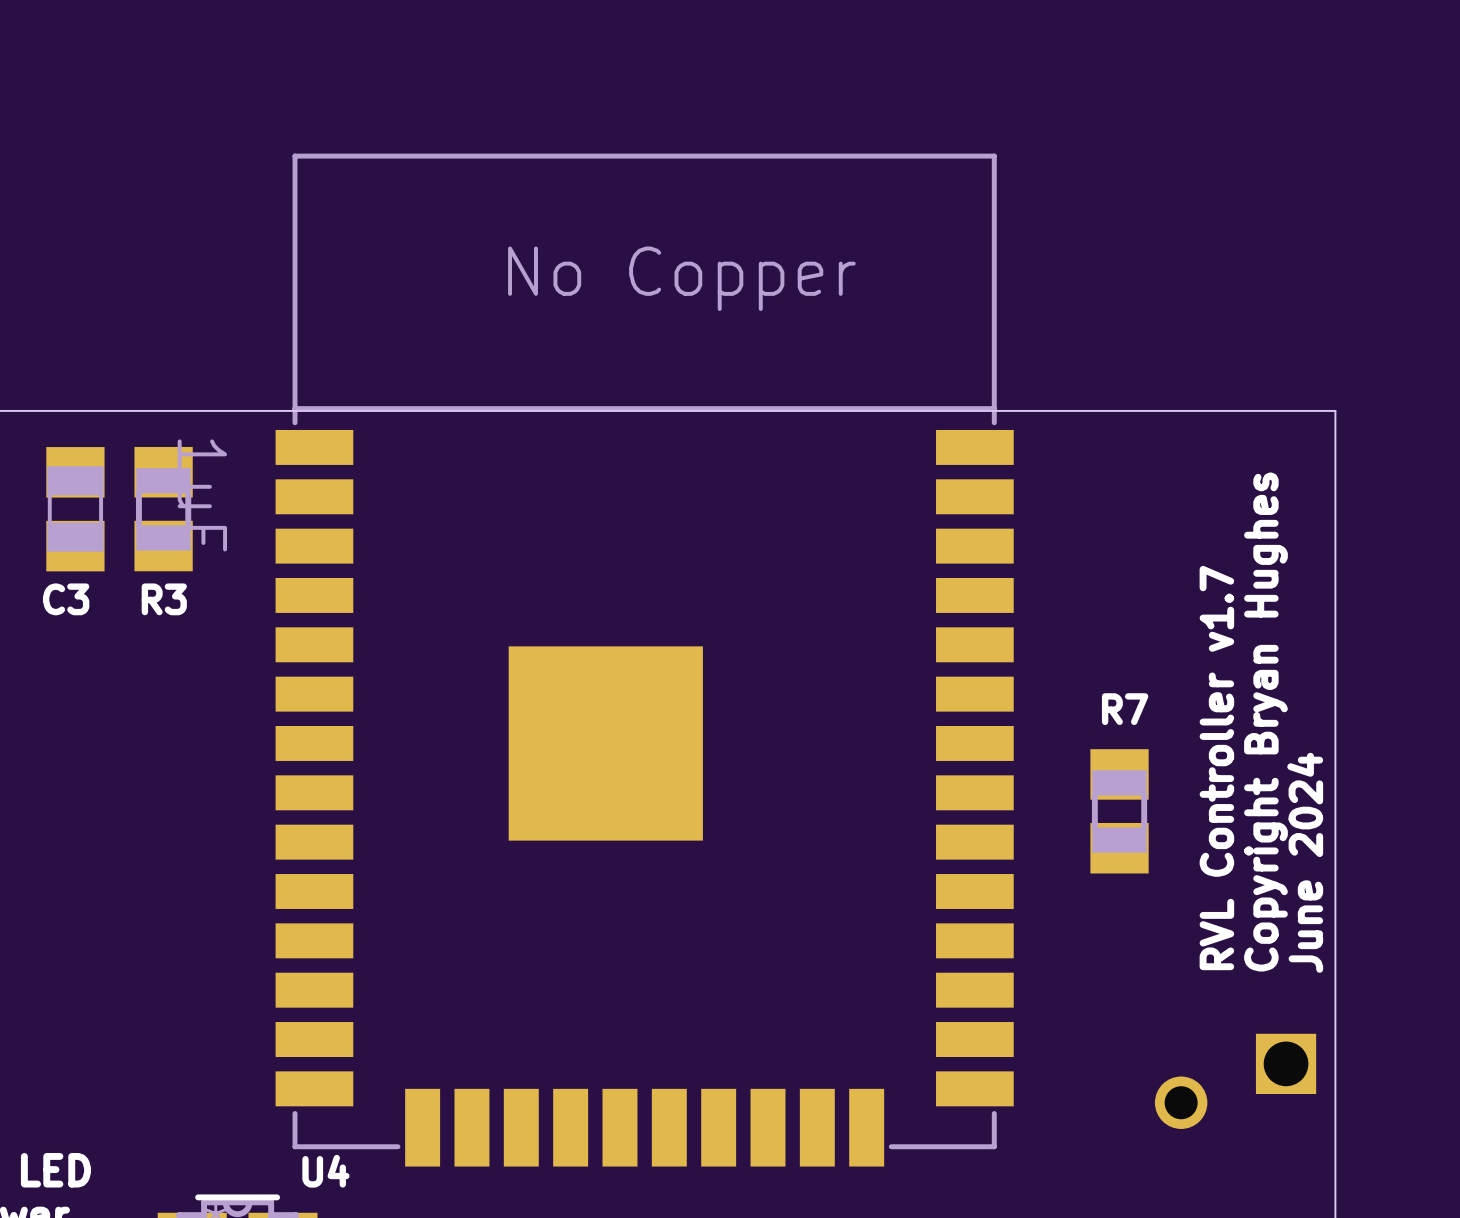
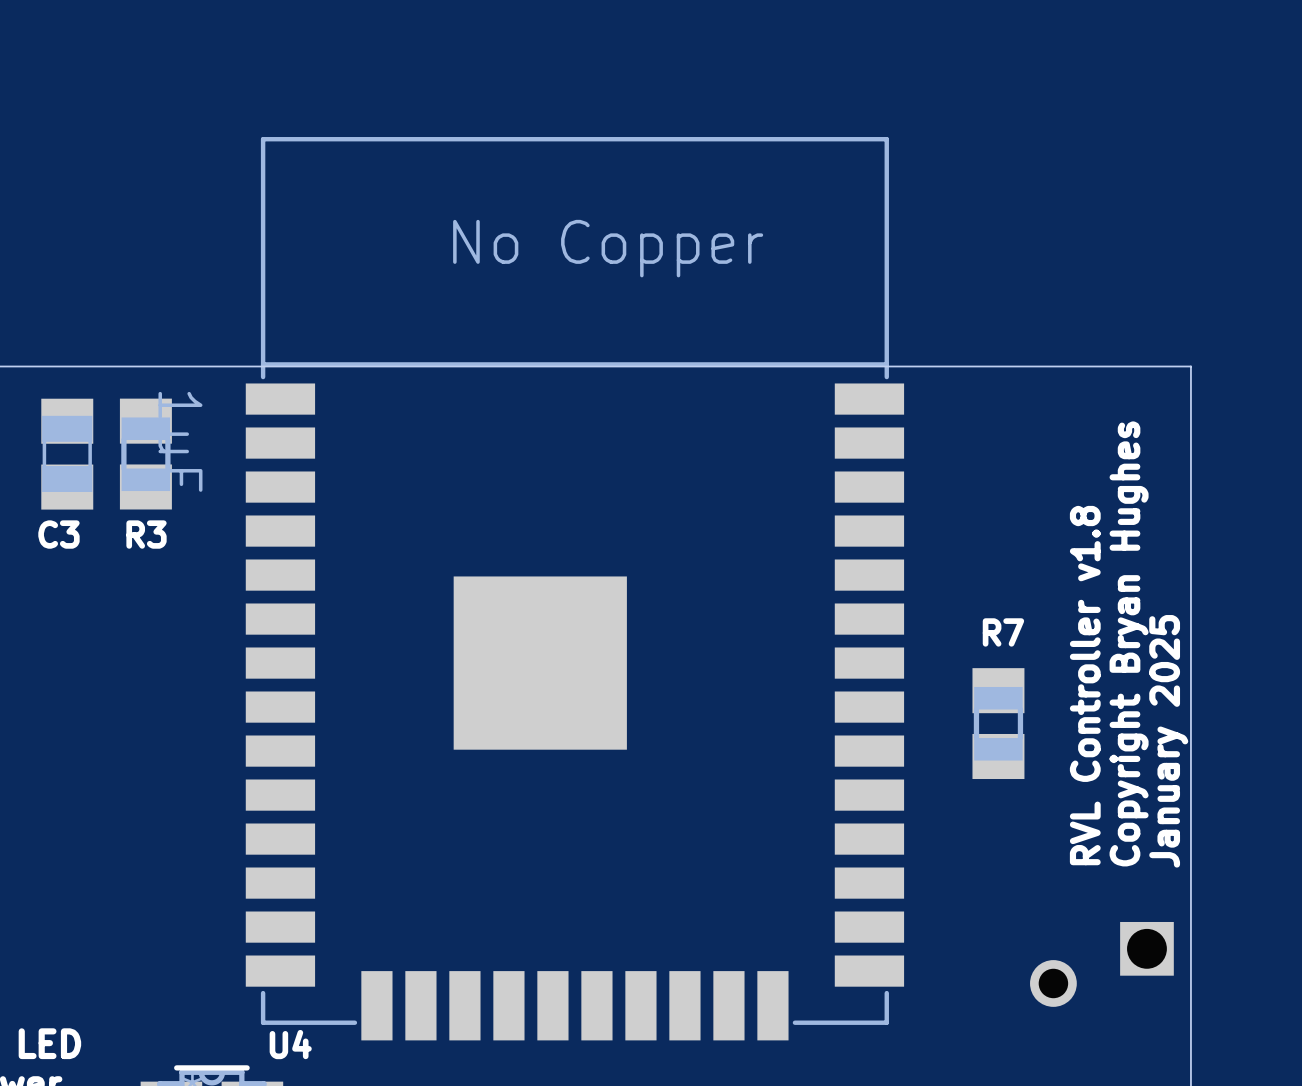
text: RVL Controller v1.7 (1216, 768) -> RVL Controller v1.8 (1085, 685)
text: June 2024 (1305, 862) -> January 2025 (1168, 741)

